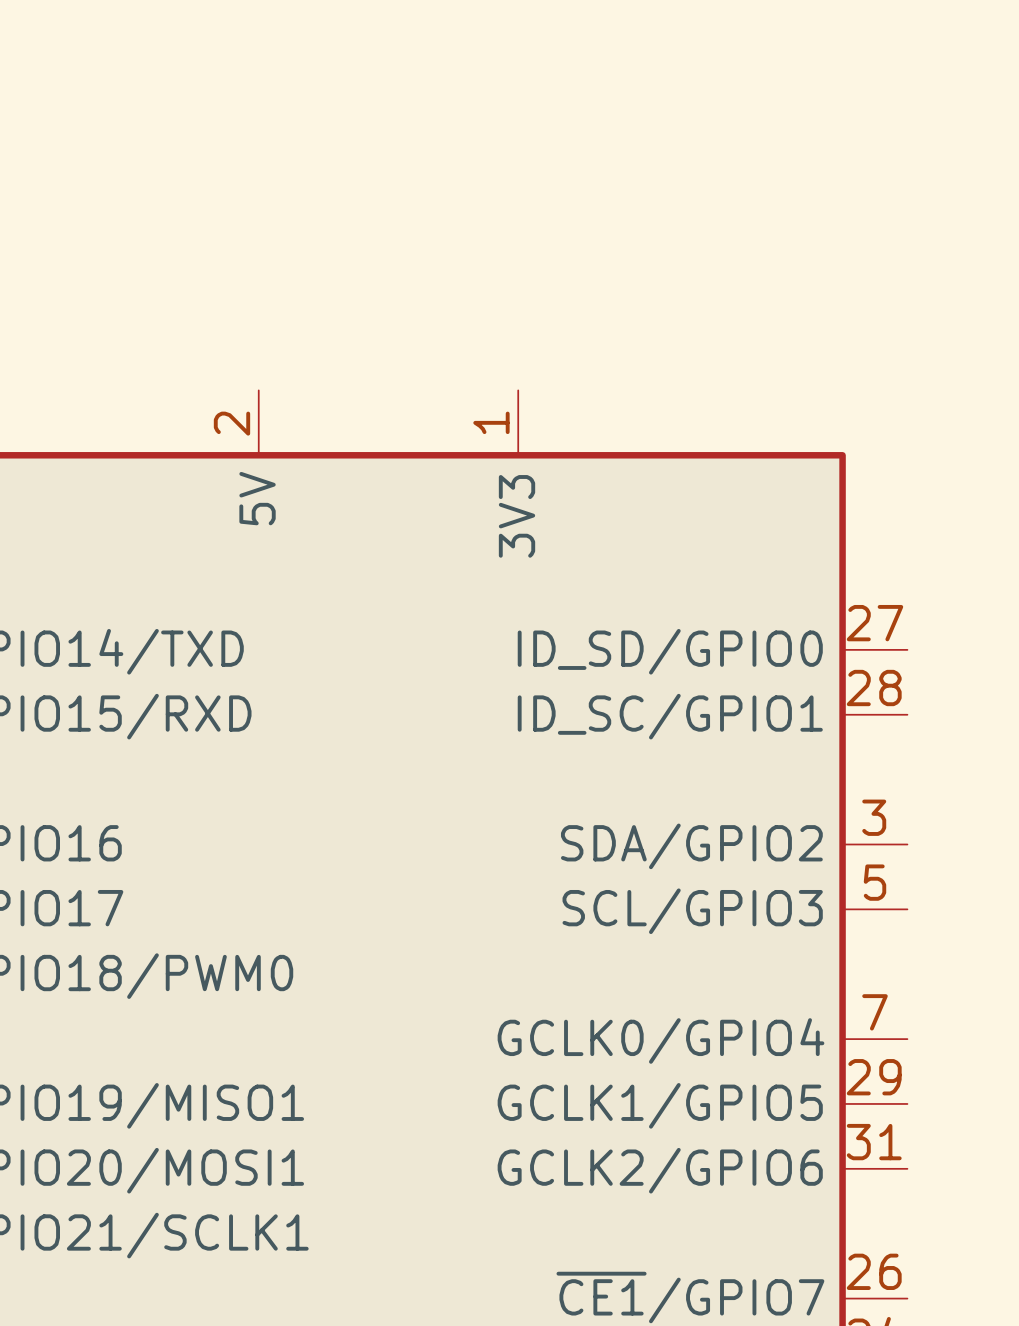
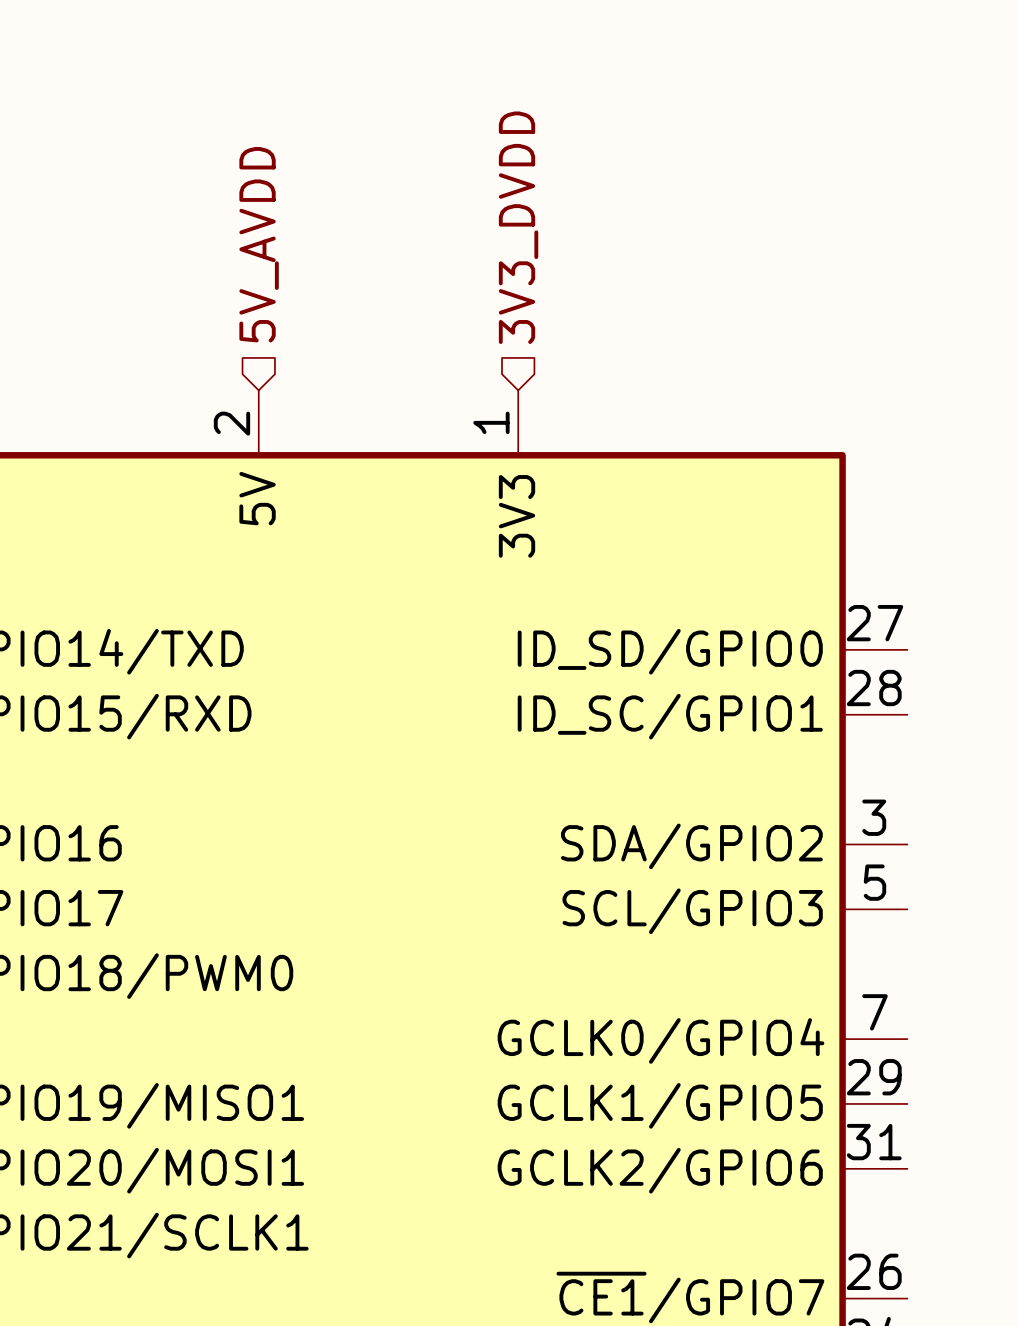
hierarchical label: none -> 3V3_DVDD (518, 227)
hierarchical label: none -> 5V_AVDD (259, 244)

